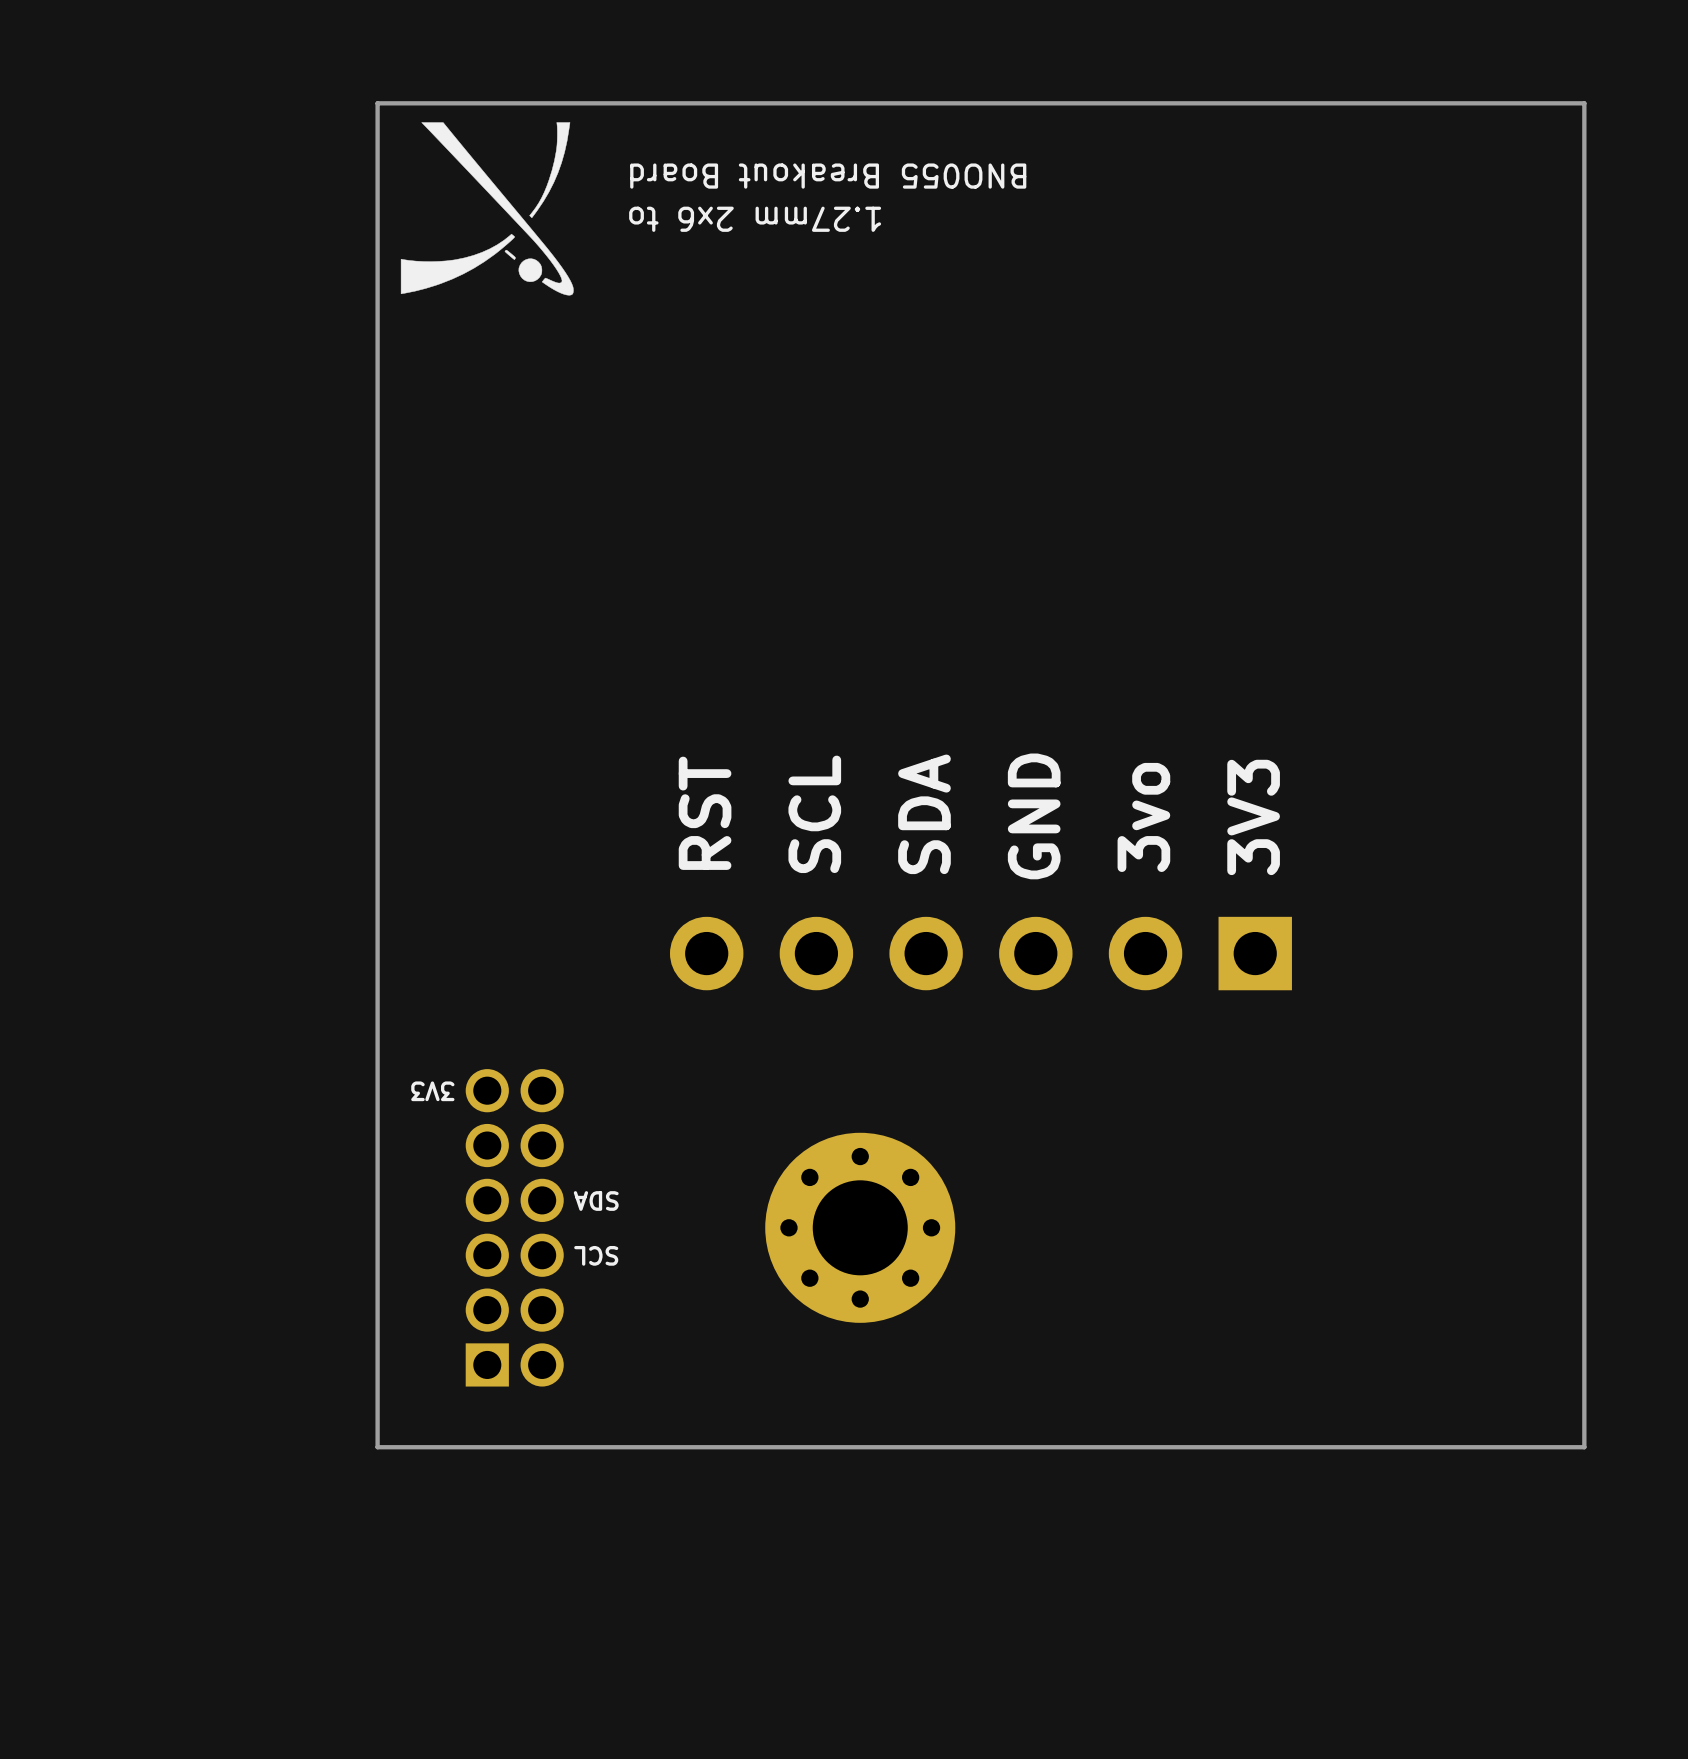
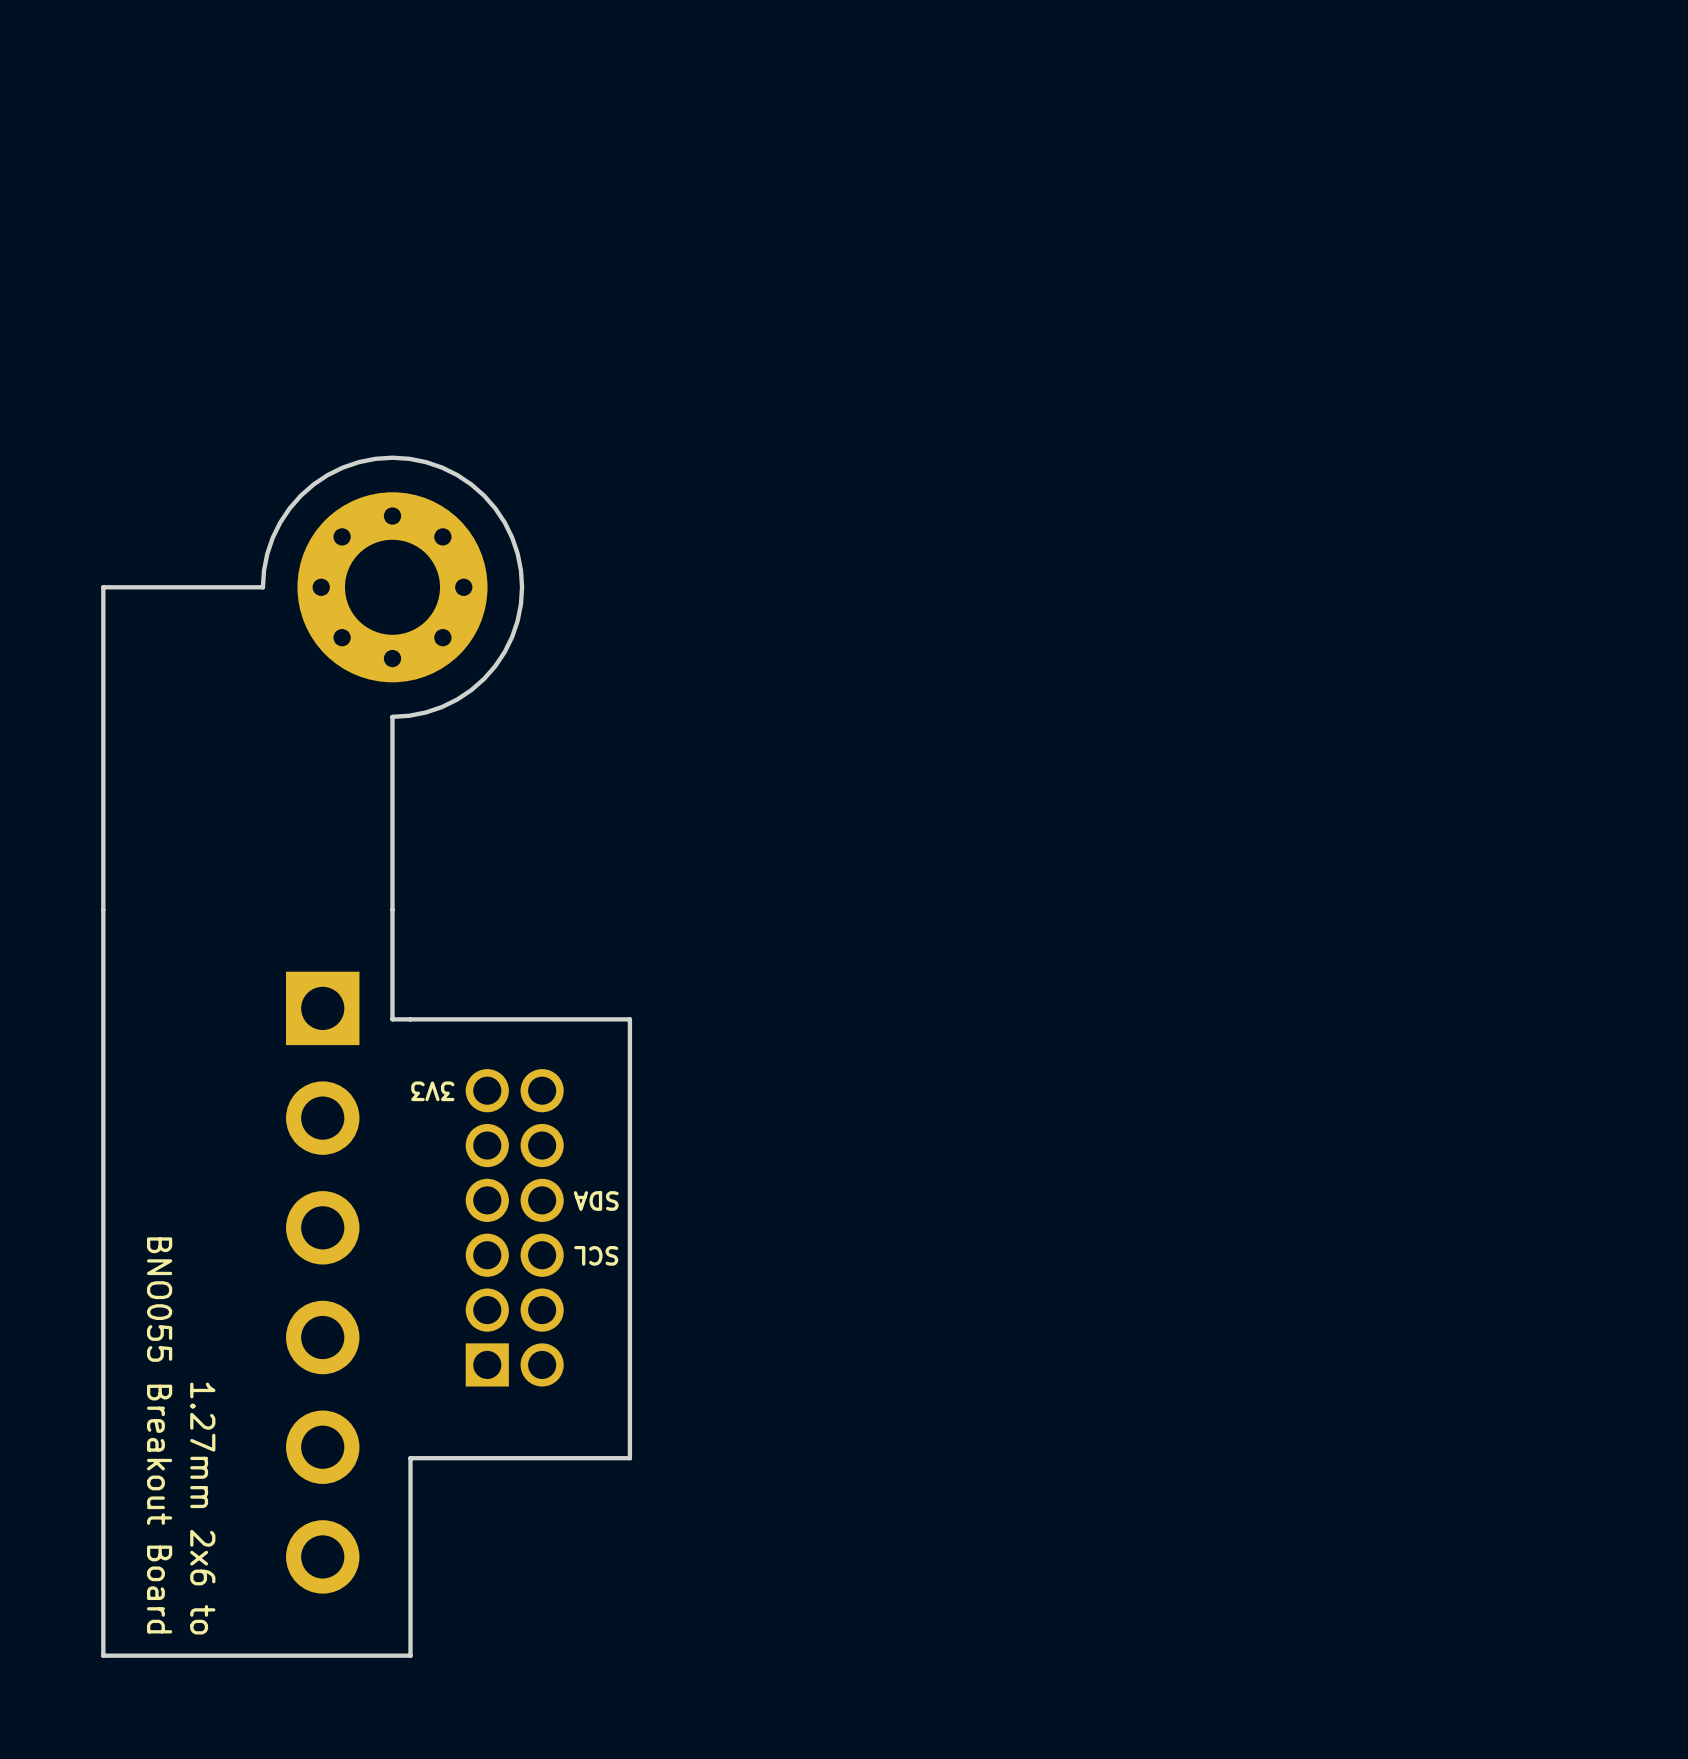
board edge: (1584, 103) (1584, 1447) (377, 1447) (377, 103) (1584, 103) -> none
drawing: [400, 122, 574, 296] -> none
text: BNO055 Breakout Board (828, 176) -> none
text: 1.27mm 2x6 to (755, 219) -> none
board edge: none -> (262, 587) (103, 587) (103, 1655) (410, 1655) (410, 1458) (629, 1458) (629, 1019) (392, 1019) (392, 716) (426, 712) (442, 707) (471, 690) (495, 666) (512, 636) (520, 604) (520, 570) (512, 537) (495, 508) (484, 495) (471, 484) (442, 467) (409, 458) (375, 458) (358, 462) (327, 475) (313, 484) (289, 508) (272, 537) (264, 570) (262, 587)
text: RST (705, 813) -> none
text: SCL (814, 814) -> none
text: SDA (924, 814) -> none
text: GND (1034, 816) -> none
text: 3vo (1143, 817) -> none
text: 3V3 (1253, 817) -> none
part rotation: 0° (980, 953) -> 90° counterclockwise (322, 1282)
part position: (980, 953) -> (322, 1282)
part position: (860, 1227) -> (392, 587)
text: none -> BNO055 Breakout Board (159, 1435)
text: none -> 1.27mm 2x6 to (202, 1508)

